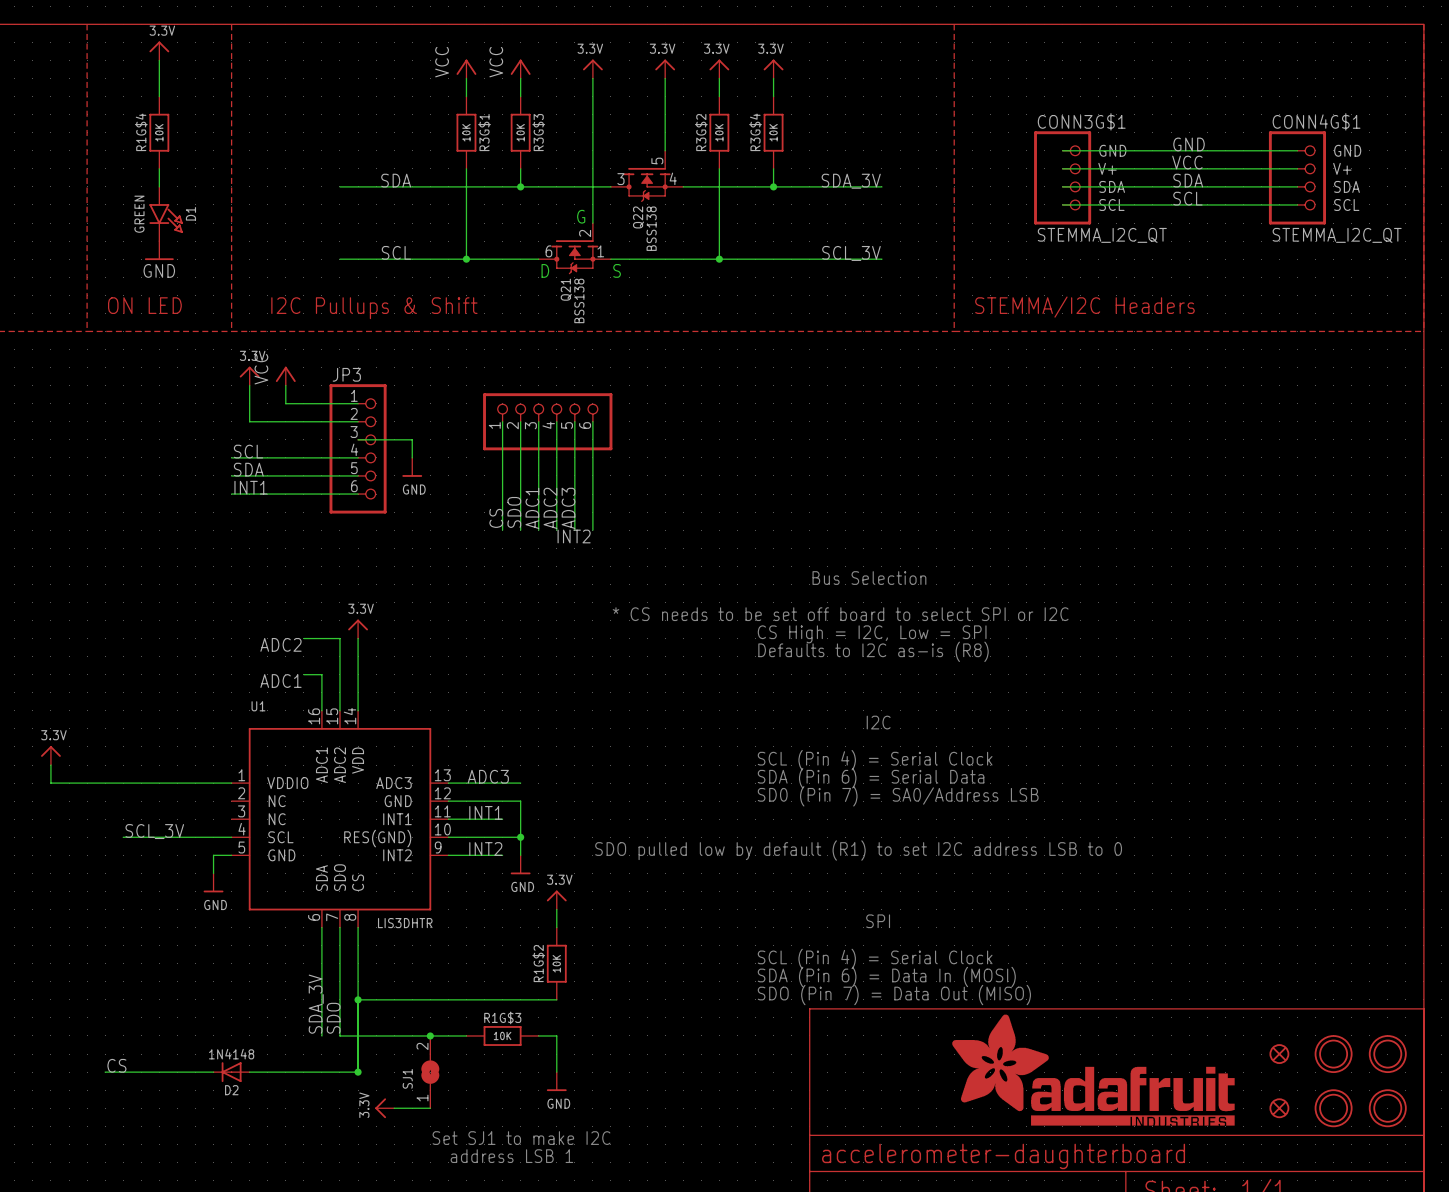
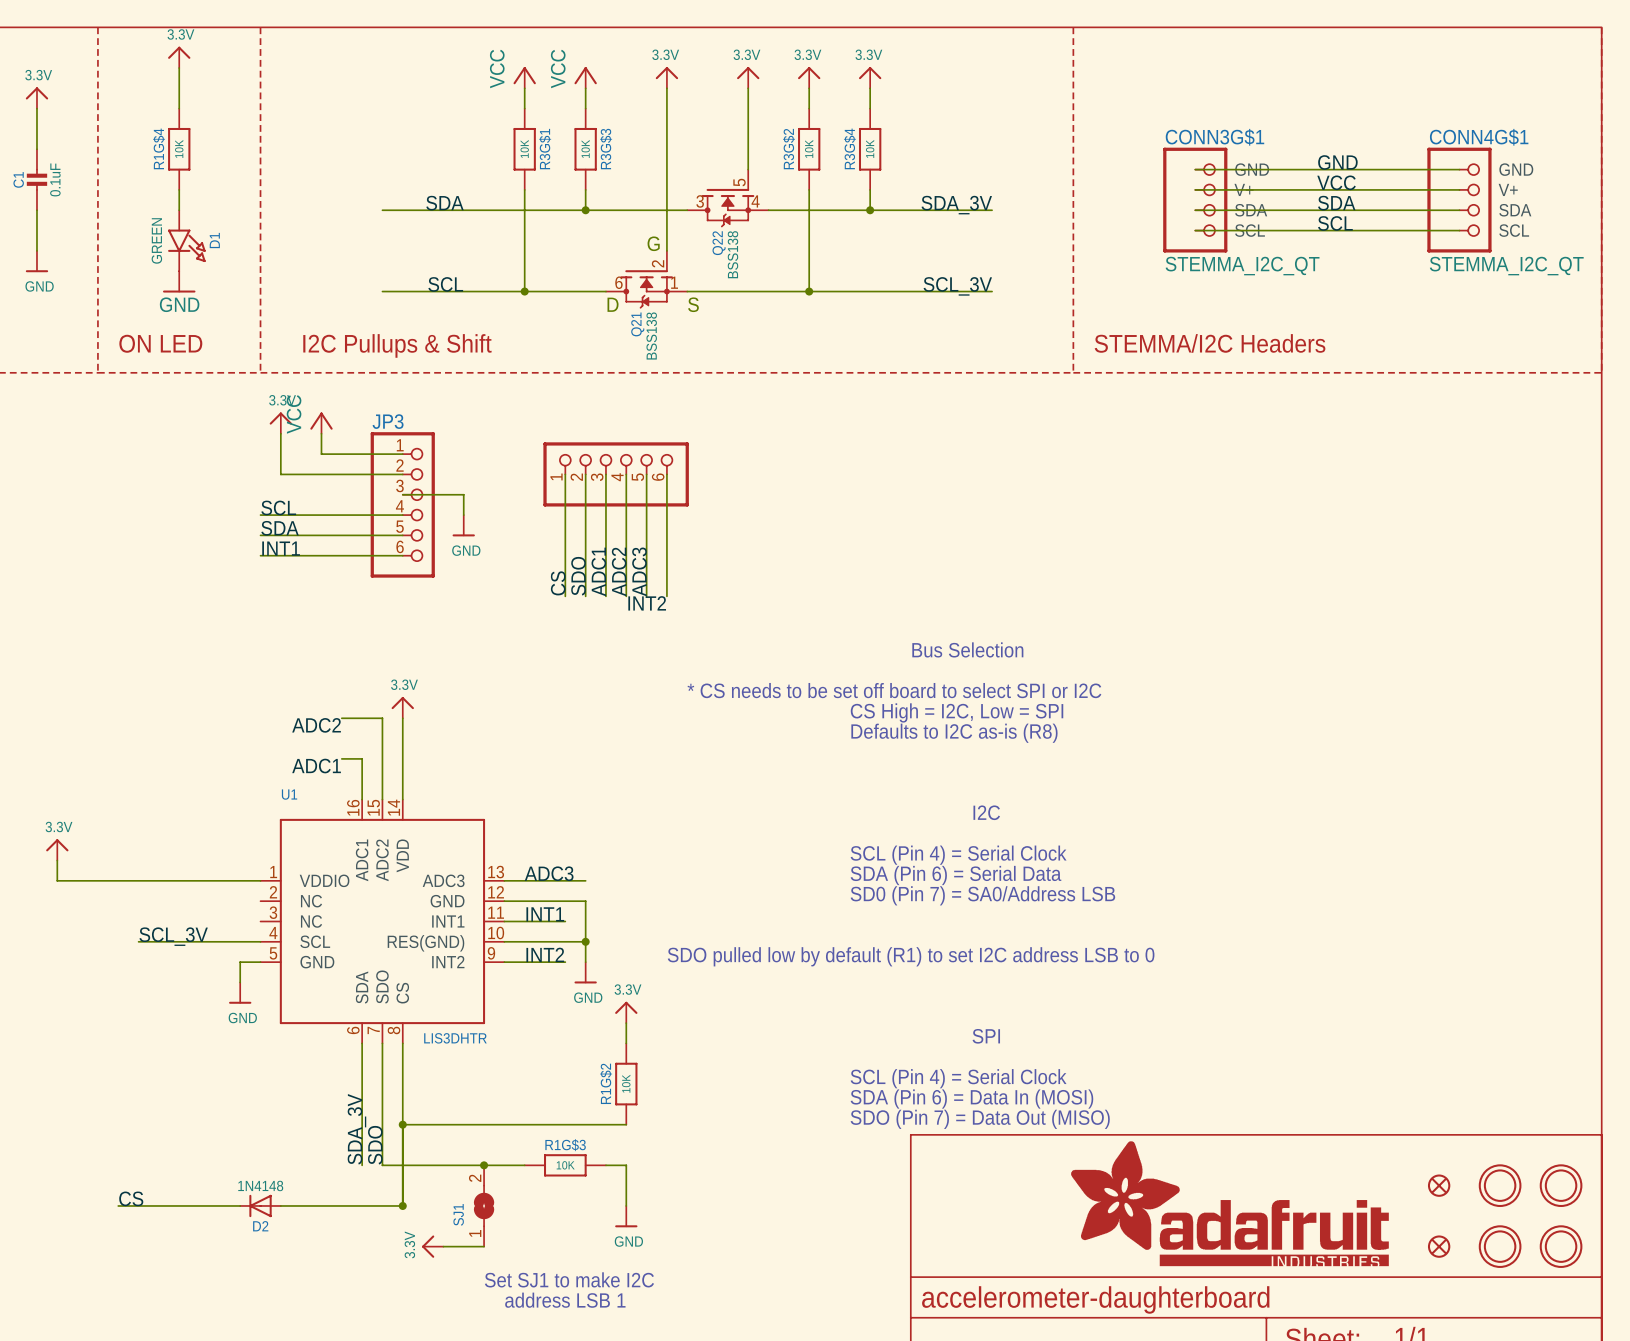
power symbol: none -> 3.3V (36, 97)
wire: none -> (36, 108) (36, 149)
C1: none -> 0.1uF (36, 179)
wire: none -> (36, 210) (36, 250)
power symbol: none -> GND (36, 261)

